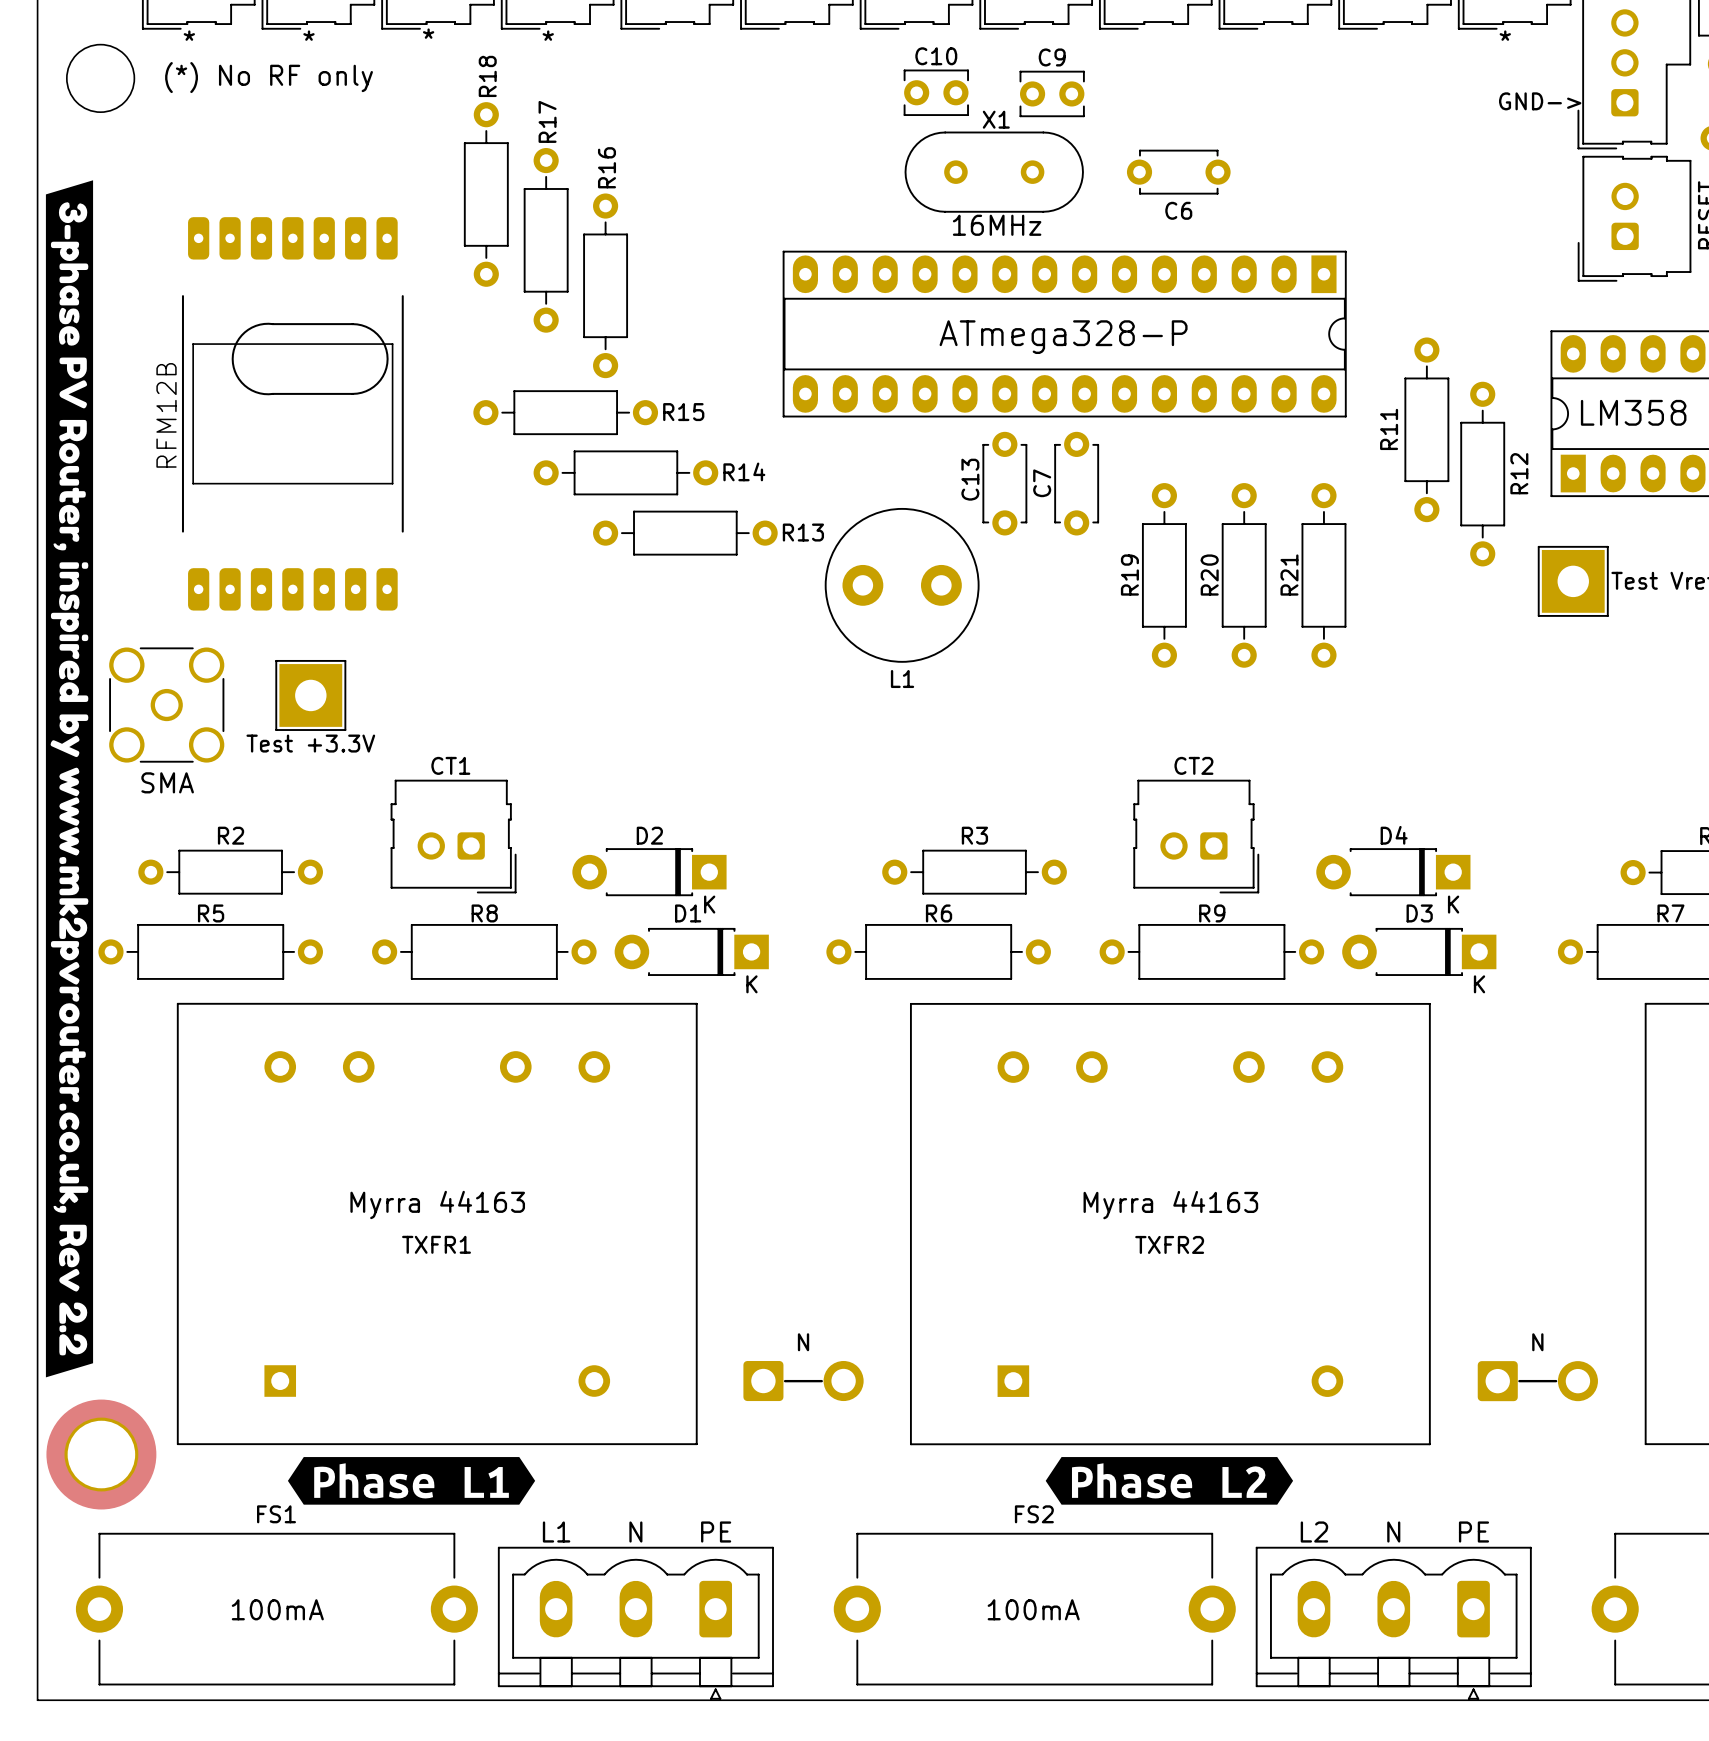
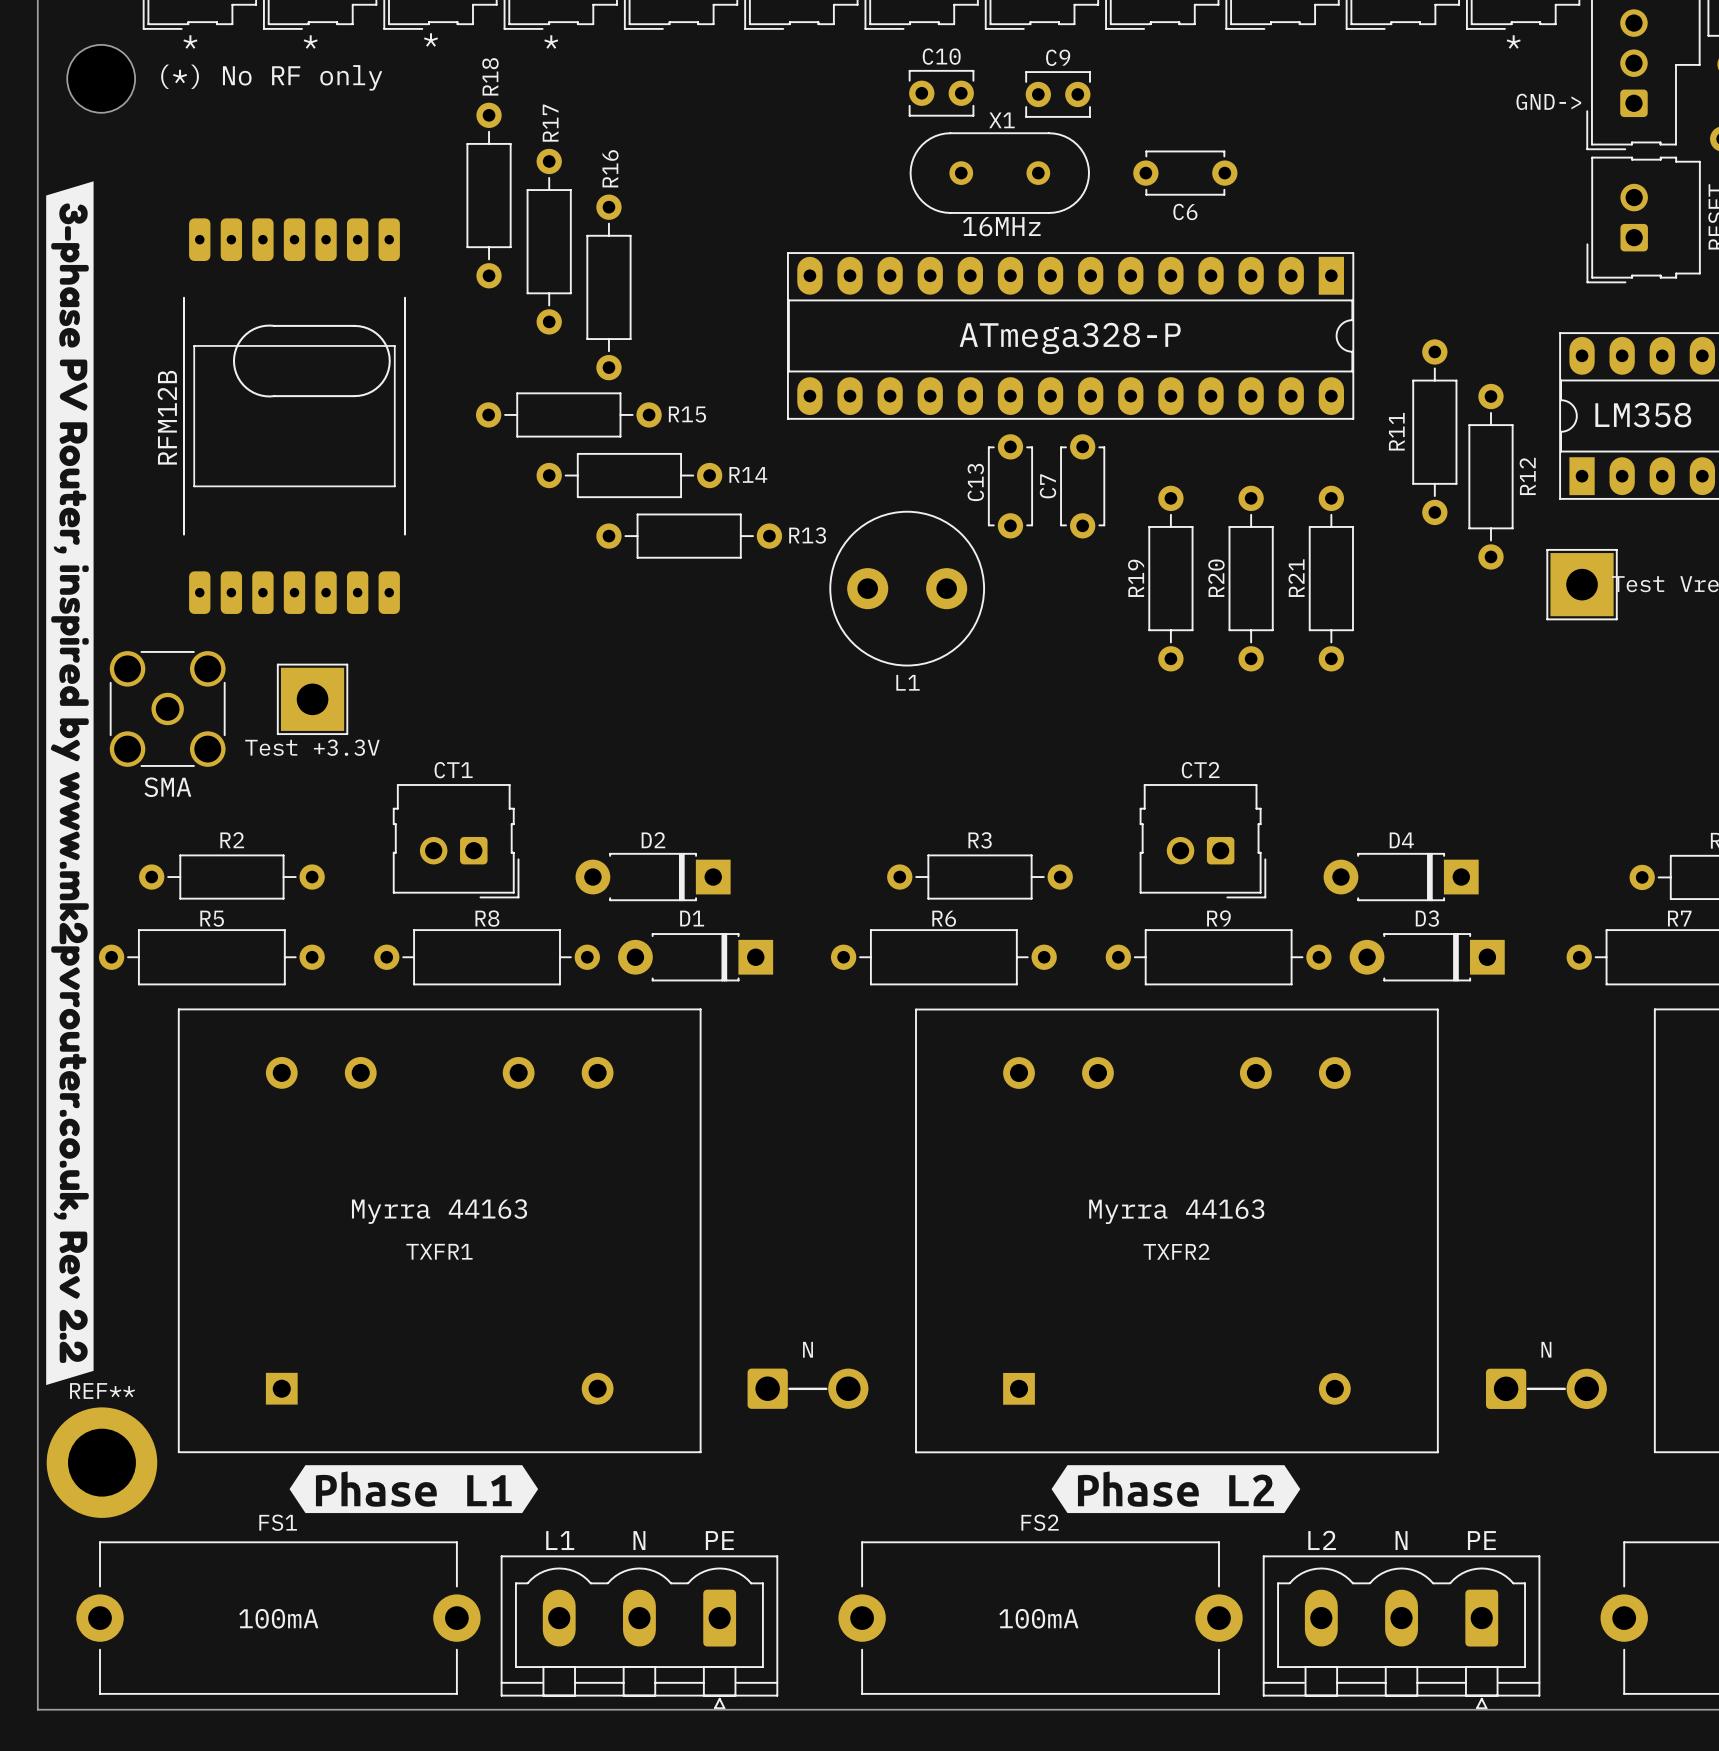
D2 text: K (709, 904) -> none
D4 text: K (1453, 904) -> none
D1 text: K (751, 984) -> none
D3 text: K (1479, 984) -> none
REF** name: none -> REF** (102, 1390)

